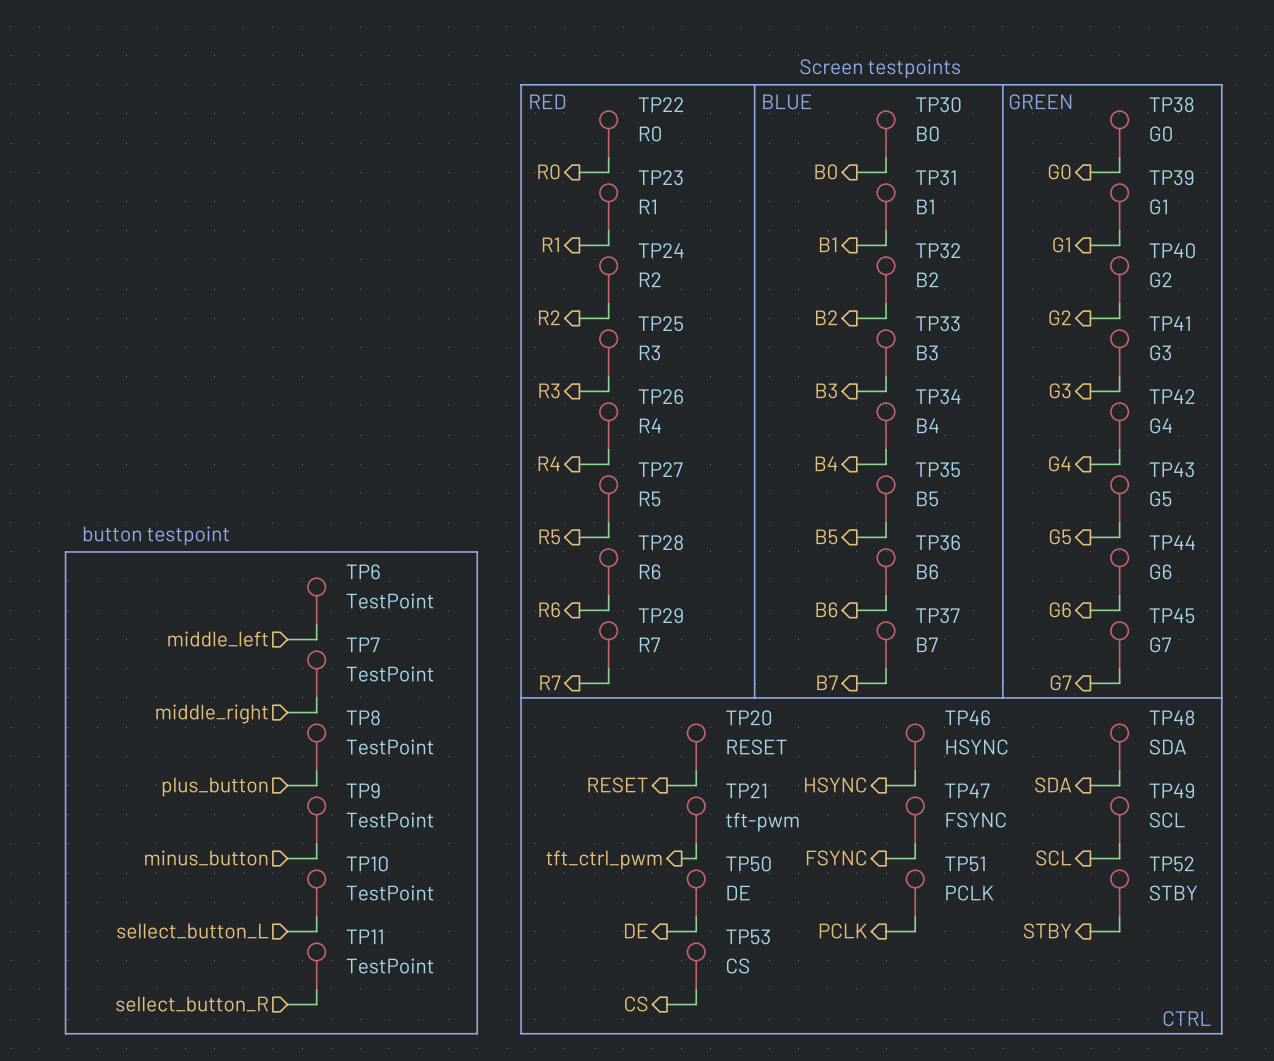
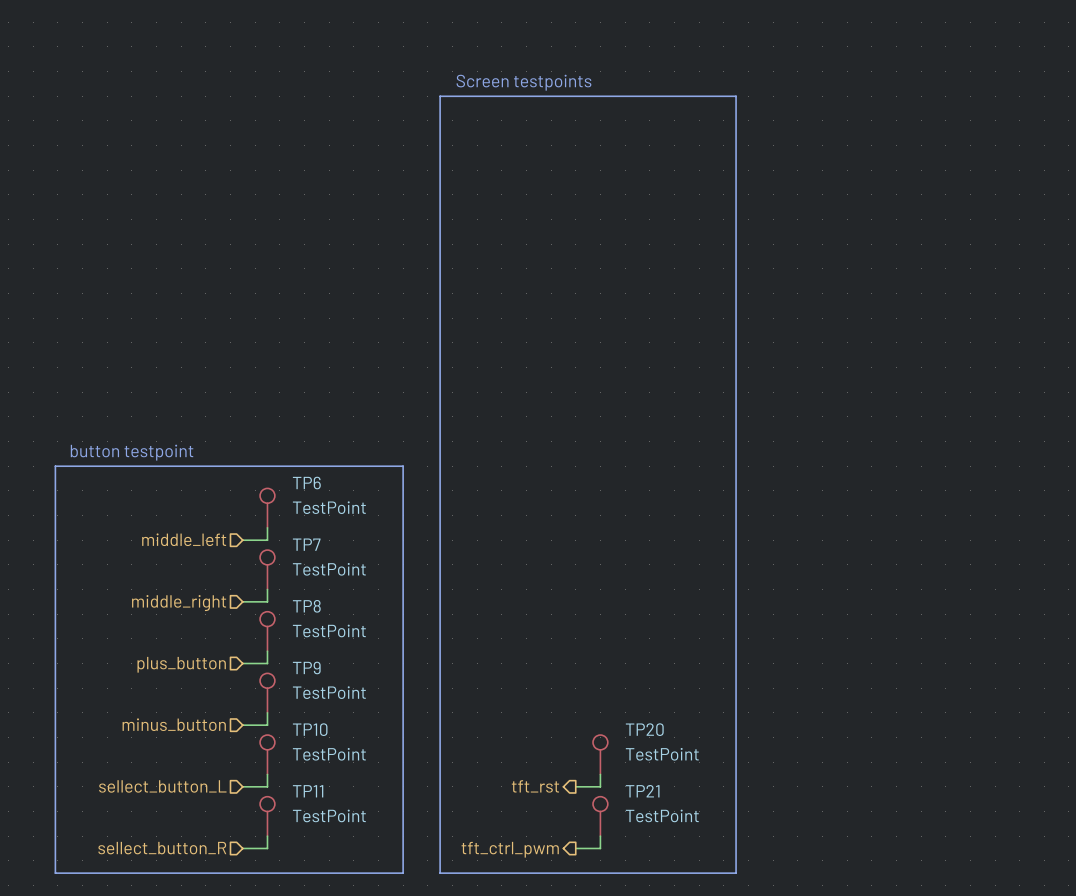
text position: Screen testpoints (880, 68) -> Screen testpoints (523, 82)
line: (754, 84) (754, 697) -> none
line: (1002, 84) (1002, 697) -> none
text: RED (547, 101) -> none
text: BLUE (787, 101) -> none
text: GREEN (1040, 101) -> none
line: (521, 113) (521, 84) (1221, 84) (1221, 1033) (871, 1033) -> (440, 96) (736, 96) (736, 873)
TP22: R0 (608, 134) -> none
TP30: B0 (886, 134) -> none
TP38: G0 (1119, 134) -> none
wire: (608, 157) (608, 172) (579, 172) -> none
wire: (886, 157) (886, 172) (856, 172) -> none
wire: (1119, 157) (1119, 172) (1090, 172) -> none
hierarchical label: R0 (548, 171) -> none
hierarchical label: B0 (826, 171) -> none
hierarchical label: G0 (1059, 171) -> none
TP23: R1 (608, 207) -> none
TP31: B1 (886, 207) -> none
TP39: G1 (1119, 207) -> none
wire: (608, 230) (608, 245) (579, 245) -> none
wire: (886, 230) (886, 245) (856, 245) -> none
wire: (1119, 230) (1119, 245) (1090, 245) -> none
hierarchical label: R1 (550, 244) -> none
hierarchical label: B1 (828, 244) -> none
hierarchical label: G1 (1061, 244) -> none
TP24: R2 (608, 280) -> none
TP32: B2 (886, 280) -> none
TP40: G2 (1119, 280) -> none
wire: (608, 303) (608, 318) (579, 318) -> none
wire: (886, 303) (886, 318) (856, 318) -> none
wire: (1119, 303) (1119, 318) (1090, 318) -> none
hierarchical label: R2 (549, 317) -> none
hierarchical label: B2 (826, 317) -> none
hierarchical label: G2 (1060, 317) -> none
TP25: R3 (608, 353) -> none
TP33: B3 (886, 353) -> none
TP41: G3 (1119, 353) -> none
wire: (608, 376) (608, 391) (579, 391) -> none
wire: (886, 376) (886, 391) (856, 391) -> none
wire: (1119, 376) (1119, 391) (1090, 391) -> none
hierarchical label: R3 (549, 390) -> none
hierarchical label: B3 (826, 390) -> none
hierarchical label: G3 (1060, 390) -> none
TP26: R4 (608, 426) -> none
TP34: B4 (886, 426) -> none
TP42: G4 (1119, 426) -> none
wire: (608, 449) (608, 464) (579, 464) -> none
wire: (886, 449) (886, 464) (856, 464) -> none
wire: (1119, 449) (1119, 464) (1090, 464) -> none
hierarchical label: R4 (549, 463) -> none
hierarchical label: B4 (826, 463) -> none
hierarchical label: G4 (1059, 463) -> none
TP27: R5 (608, 499) -> none
TP35: B5 (886, 499) -> none
TP43: G5 (1119, 499) -> none
wire: (608, 522) (608, 537) (579, 537) -> none
wire: (886, 522) (886, 537) (856, 537) -> none
wire: (1119, 522) (1119, 537) (1090, 537) -> none
hierarchical label: R5 (549, 536) -> none
hierarchical label: B5 (826, 536) -> none
hierarchical label: G5 (1060, 536) -> none
TP28: R6 (608, 572) -> none
TP36: B6 (886, 572) -> none
TP44: G6 (1119, 572) -> none
wire: (608, 595) (608, 610) (579, 610) -> none
wire: (886, 595) (886, 610) (856, 610) -> none
wire: (1119, 595) (1119, 610) (1090, 610) -> none
hierarchical label: R6 (549, 609) -> none
hierarchical label: B6 (826, 609) -> none
hierarchical label: G6 (1060, 609) -> none
TP29: R7 (608, 645) -> none
TP37: B7 (886, 645) -> none
TP45: G7 (1119, 645) -> none
wire: (608, 668) (608, 683) (579, 683) -> none
wire: (886, 668) (886, 683) (856, 683) -> none
wire: (1119, 668) (1119, 683) (1090, 683) -> none
hierarchical label: R7 (550, 682) -> none
hierarchical label: B7 (827, 682) -> none
hierarchical label: G7 (1061, 682) -> none
line: (521, 697) (1221, 697) -> none
TP20 position: (696, 747) -> (600, 754)
TP20 value: RESET (756, 747) -> TestPoint (662, 754)
TP46: HSYNC (915, 747) -> none
TP48: SDA (1119, 747) -> none
wire: (696, 770) (696, 785) (667, 785) -> none
wire: (915, 770) (915, 785) (886, 785) -> none
wire: (1119, 770) (1119, 785) (1090, 785) -> none
hierarchical label: RESET (618, 785) -> none
hierarchical label: HSYNC (835, 785) -> none
hierarchical label: SDA (1053, 785) -> none
TP21 position: (696, 820) -> (600, 816)
TP47: FSYNC (915, 820) -> none
TP49: SCL (1119, 820) -> none
TP21 value: tft-pwm (762, 822) -> TestPoint (662, 815)
wire: (696, 843) (696, 858) (681, 858) -> none
wire: (915, 843) (915, 858) (886, 858) -> none
wire: (1119, 843) (1119, 858) (1090, 858) -> none
hierarchical label: FSYNC (836, 858) -> none
hierarchical label: SCL (1053, 858) -> none
hierarchical label position: tft_ctrl_pwm (604, 860) -> tft_ctrl_pwm (510, 849)
TP50: DE (696, 893) -> none
TP51: PCLK (915, 893) -> none
TP52: STBY (1119, 893) -> none
wire: (696, 916) (696, 931) -> (600, 774) (600, 786) (588, 786)
wire: (915, 916) (915, 931) (886, 931) -> none
wire: (1119, 916) (1119, 931) (1090, 931) -> none
hierarchical label: DE (636, 930) -> none
hierarchical label: STBY (1047, 930) -> none
hierarchical label: none -> tft_rst (535, 786)
wire: (667, 931) (681, 931) -> none
hierarchical label: PCLK (843, 931) -> none
TP53: CS (696, 966) -> none
wire: (696, 989) (696, 1004) -> (600, 836) (600, 848) (588, 848)
hierarchical label: CS (636, 1004) -> none
wire: (667, 1004) (681, 1004) -> none
text: CTRL (1187, 1018) -> none

